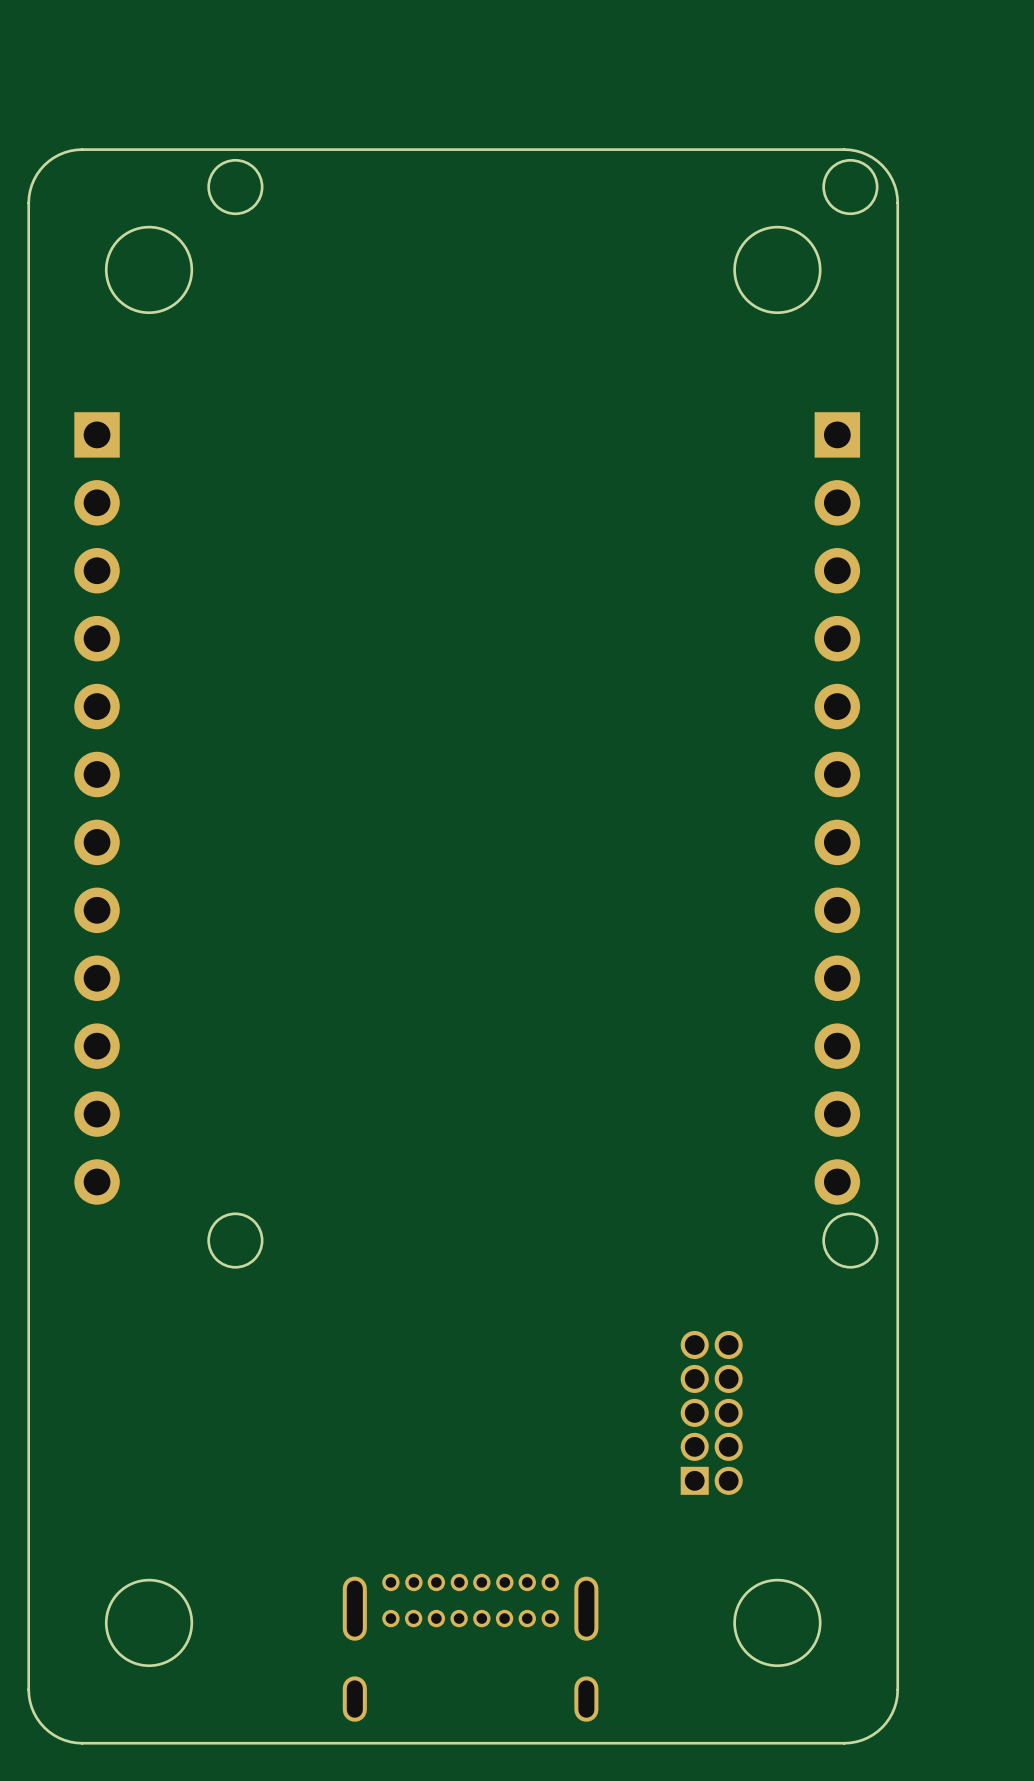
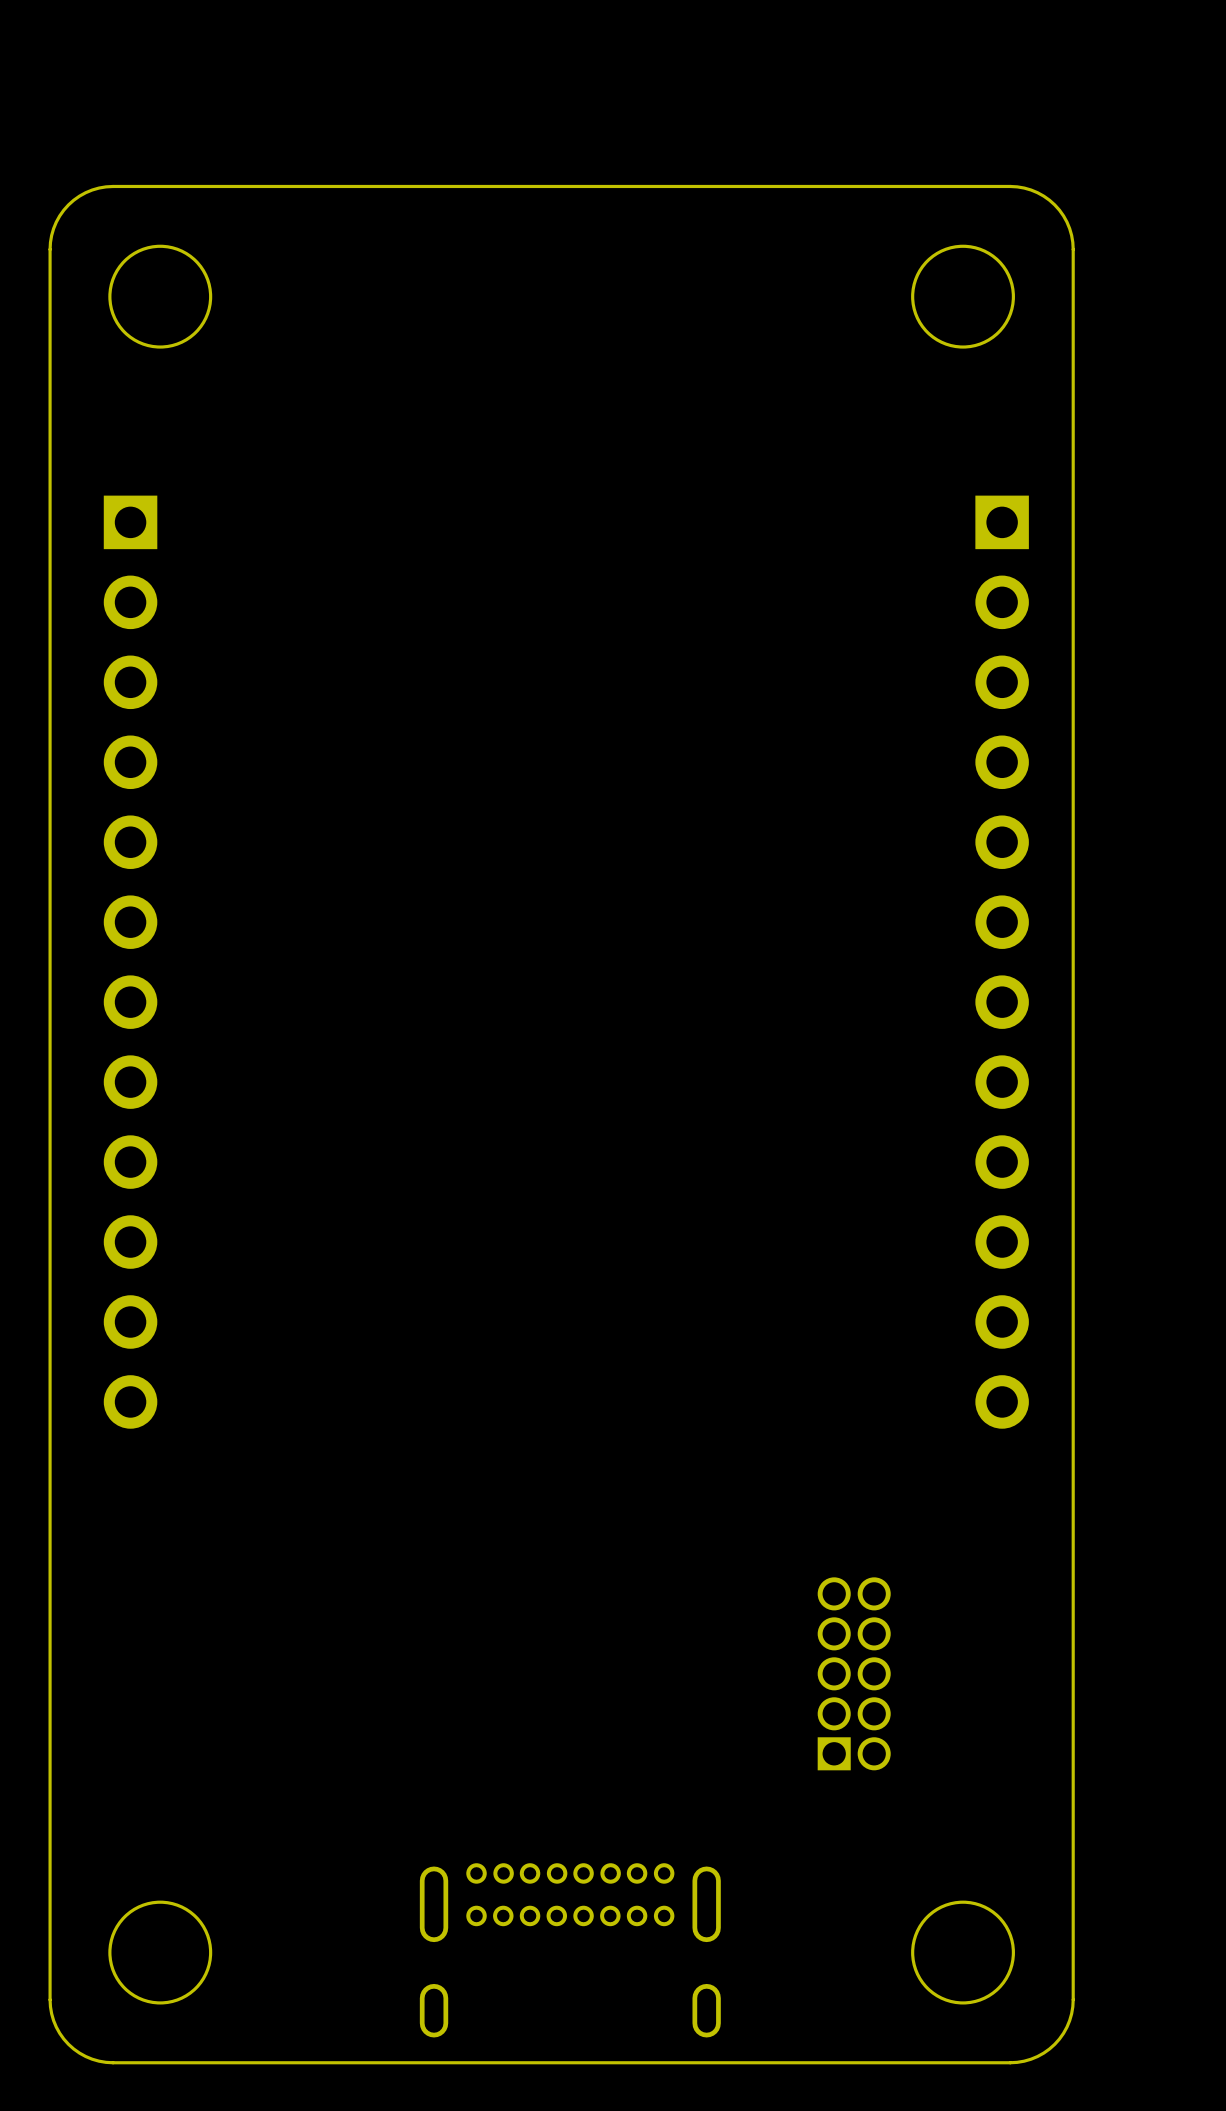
round board edge: [207, 158, 264, 216] -> none
round board edge: [822, 158, 879, 216] -> none
round board edge position: (149, 269) -> (160, 296)
round board edge position: (777, 269) -> (963, 296)
round board edge: [207, 1212, 264, 1269] -> none
round board edge: [822, 1212, 879, 1269] -> none
round board edge position: (149, 1622) -> (160, 1952)
round board edge position: (777, 1622) -> (963, 1952)

